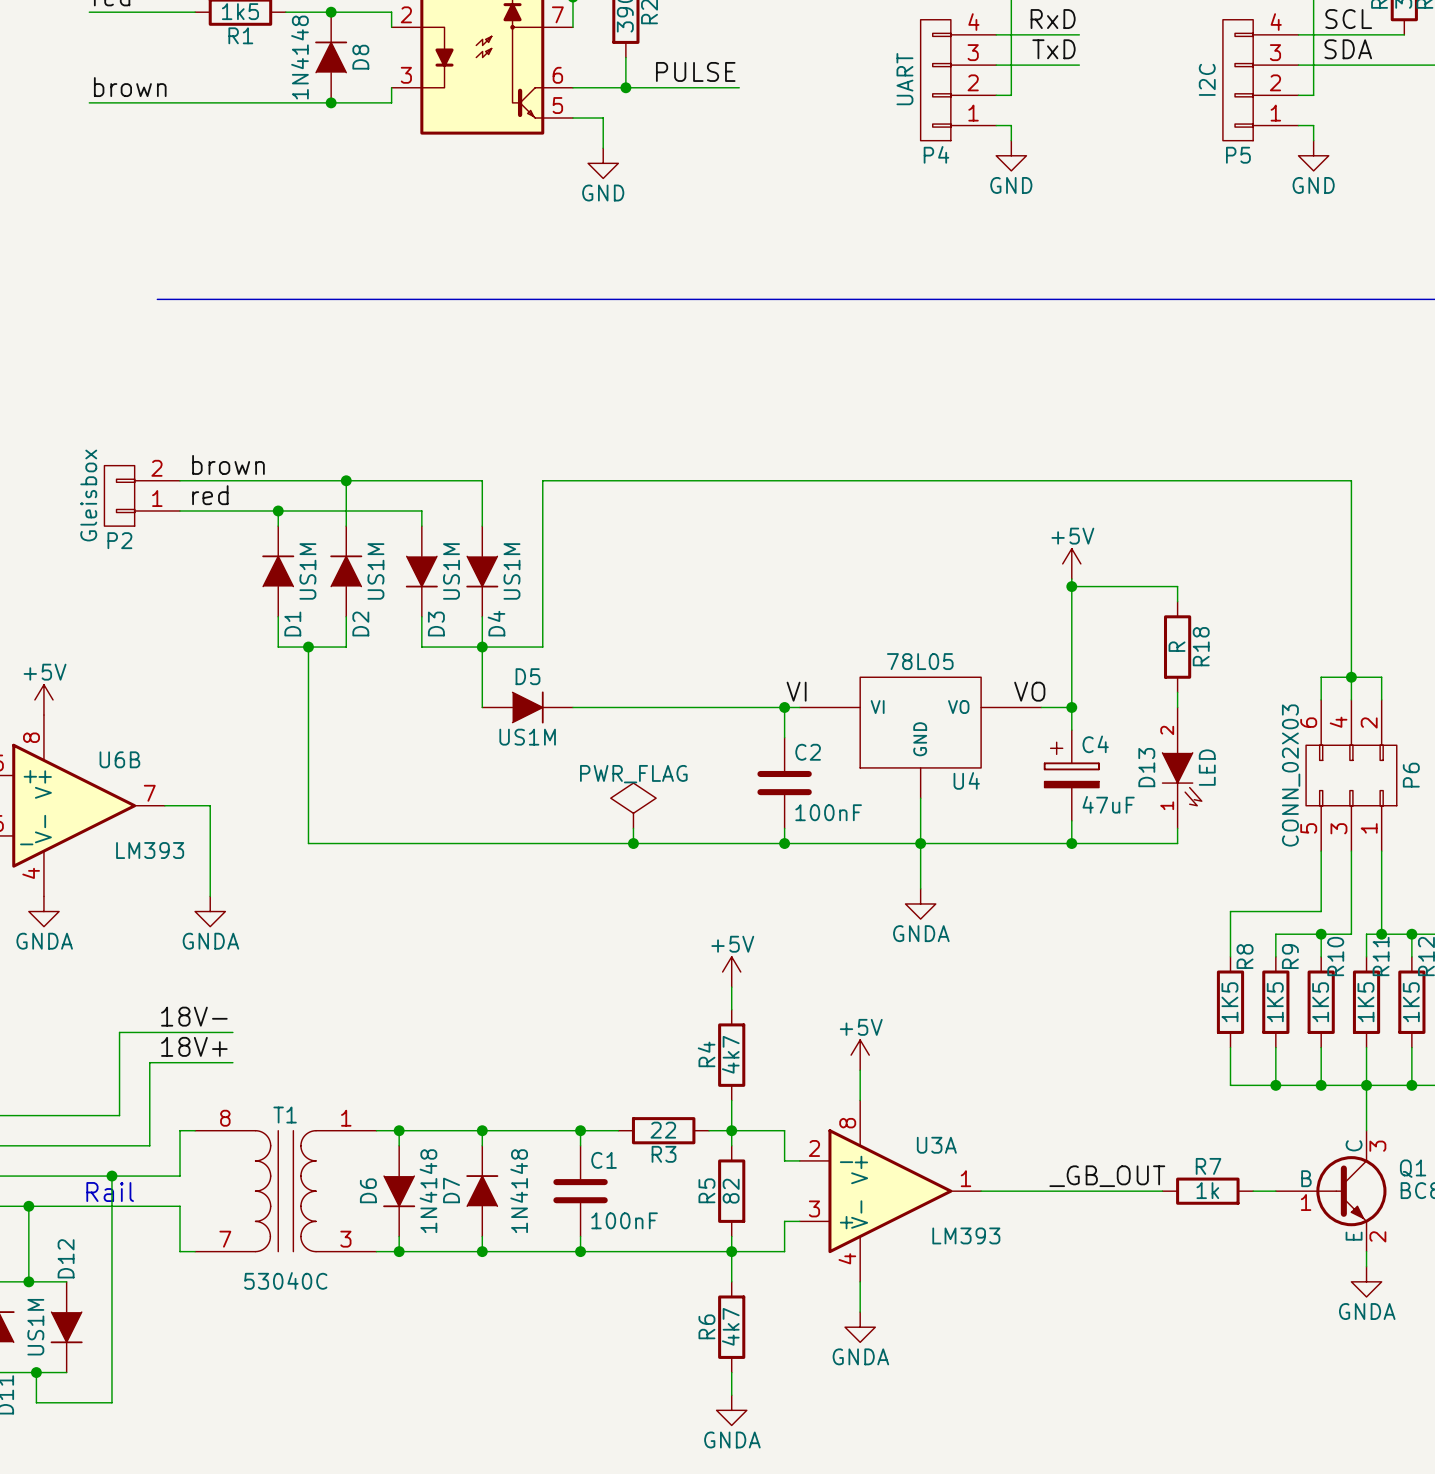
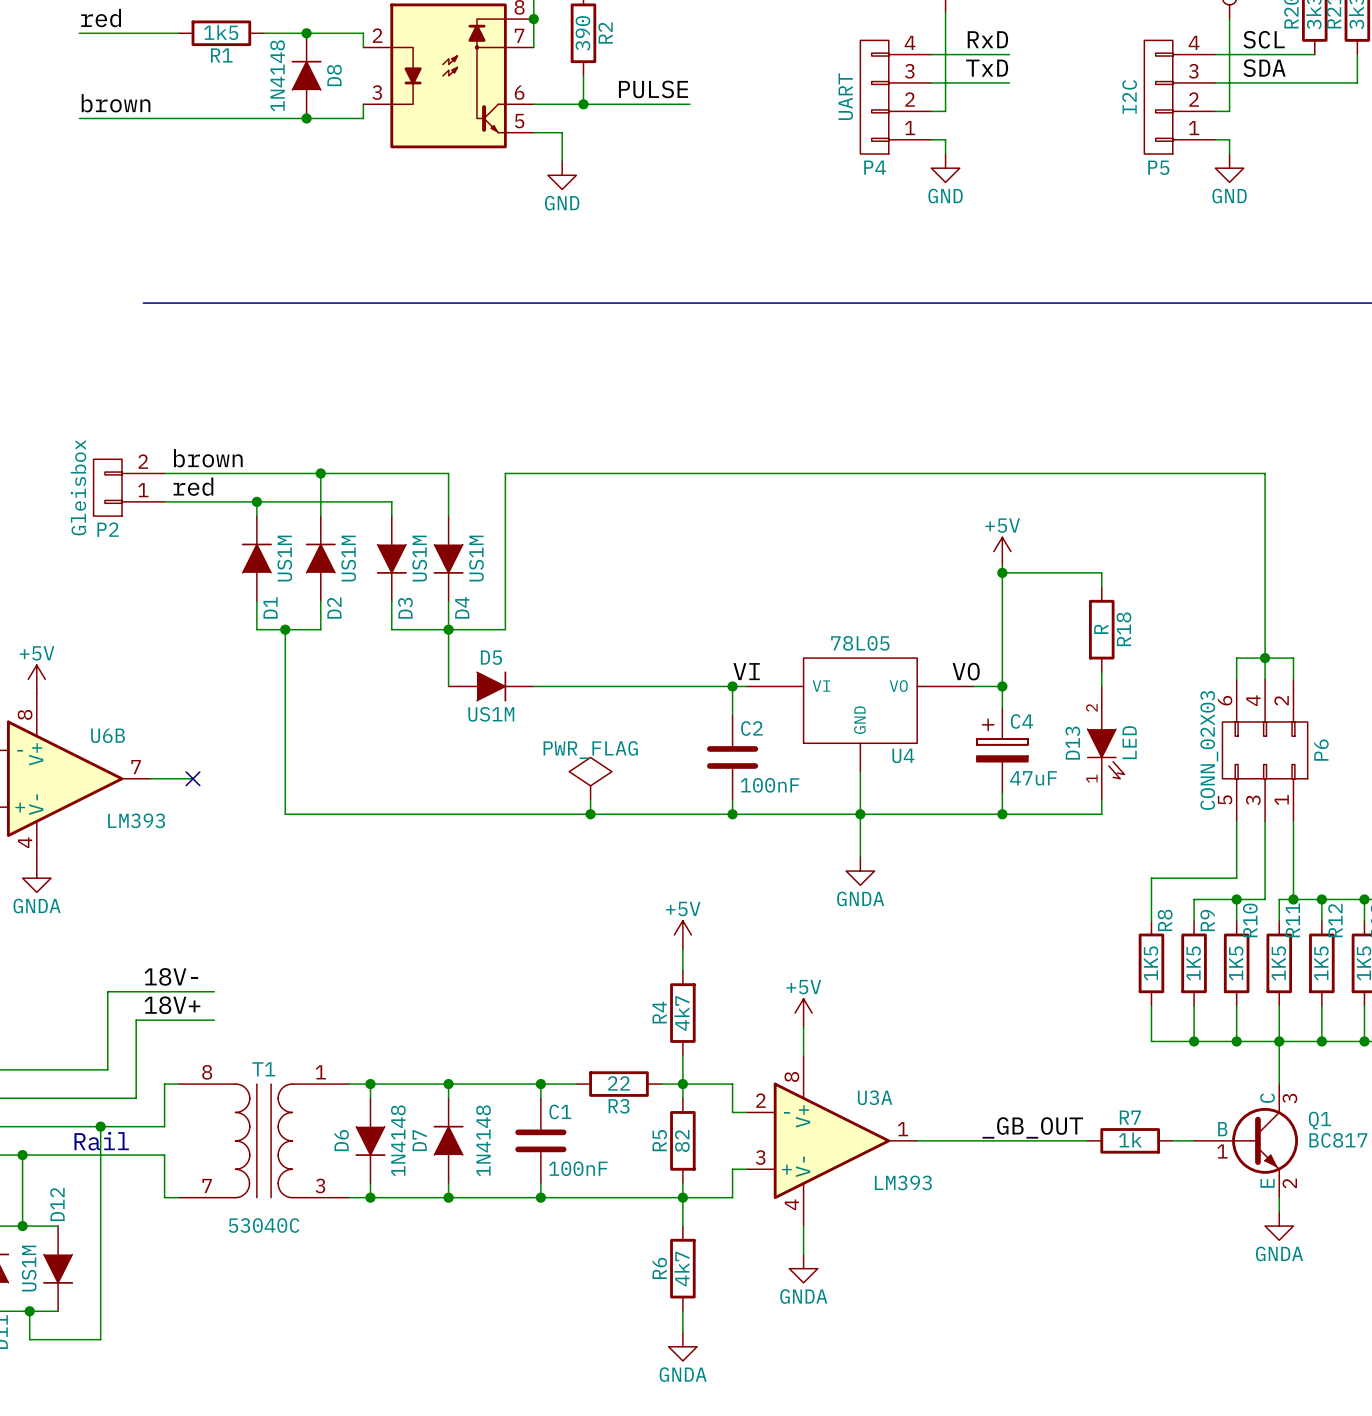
U6B pin name: + (30, 776) -> - (20, 750)
wire: (210, 805) (210, 896) -> none
no-connect mark: none -> (192, 778)
U6B pin name: _ (26, 844) -> + (20, 807)
power symbol: GNDA (210, 911) -> none

